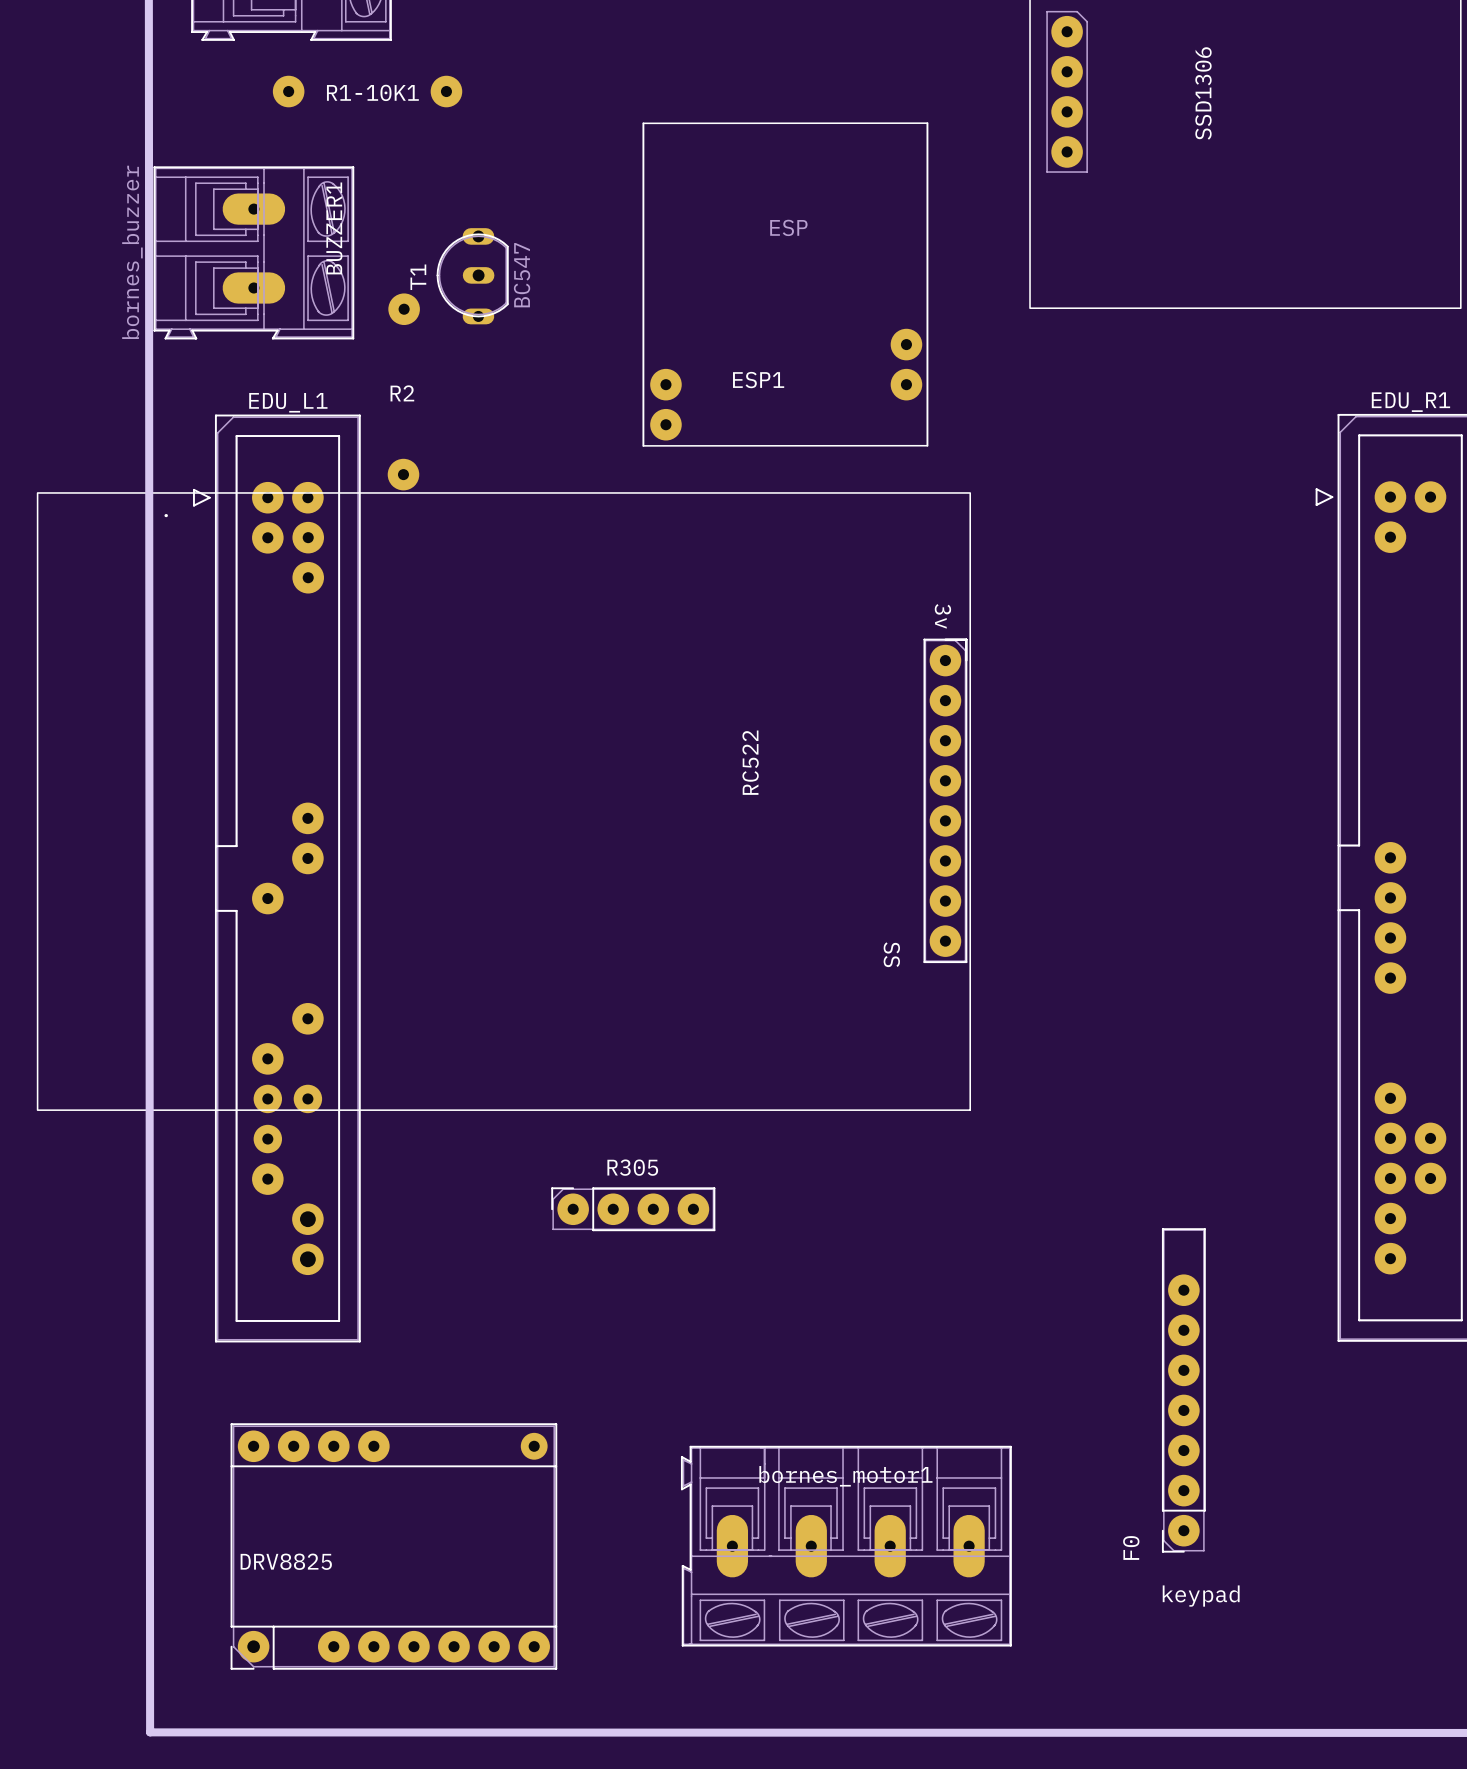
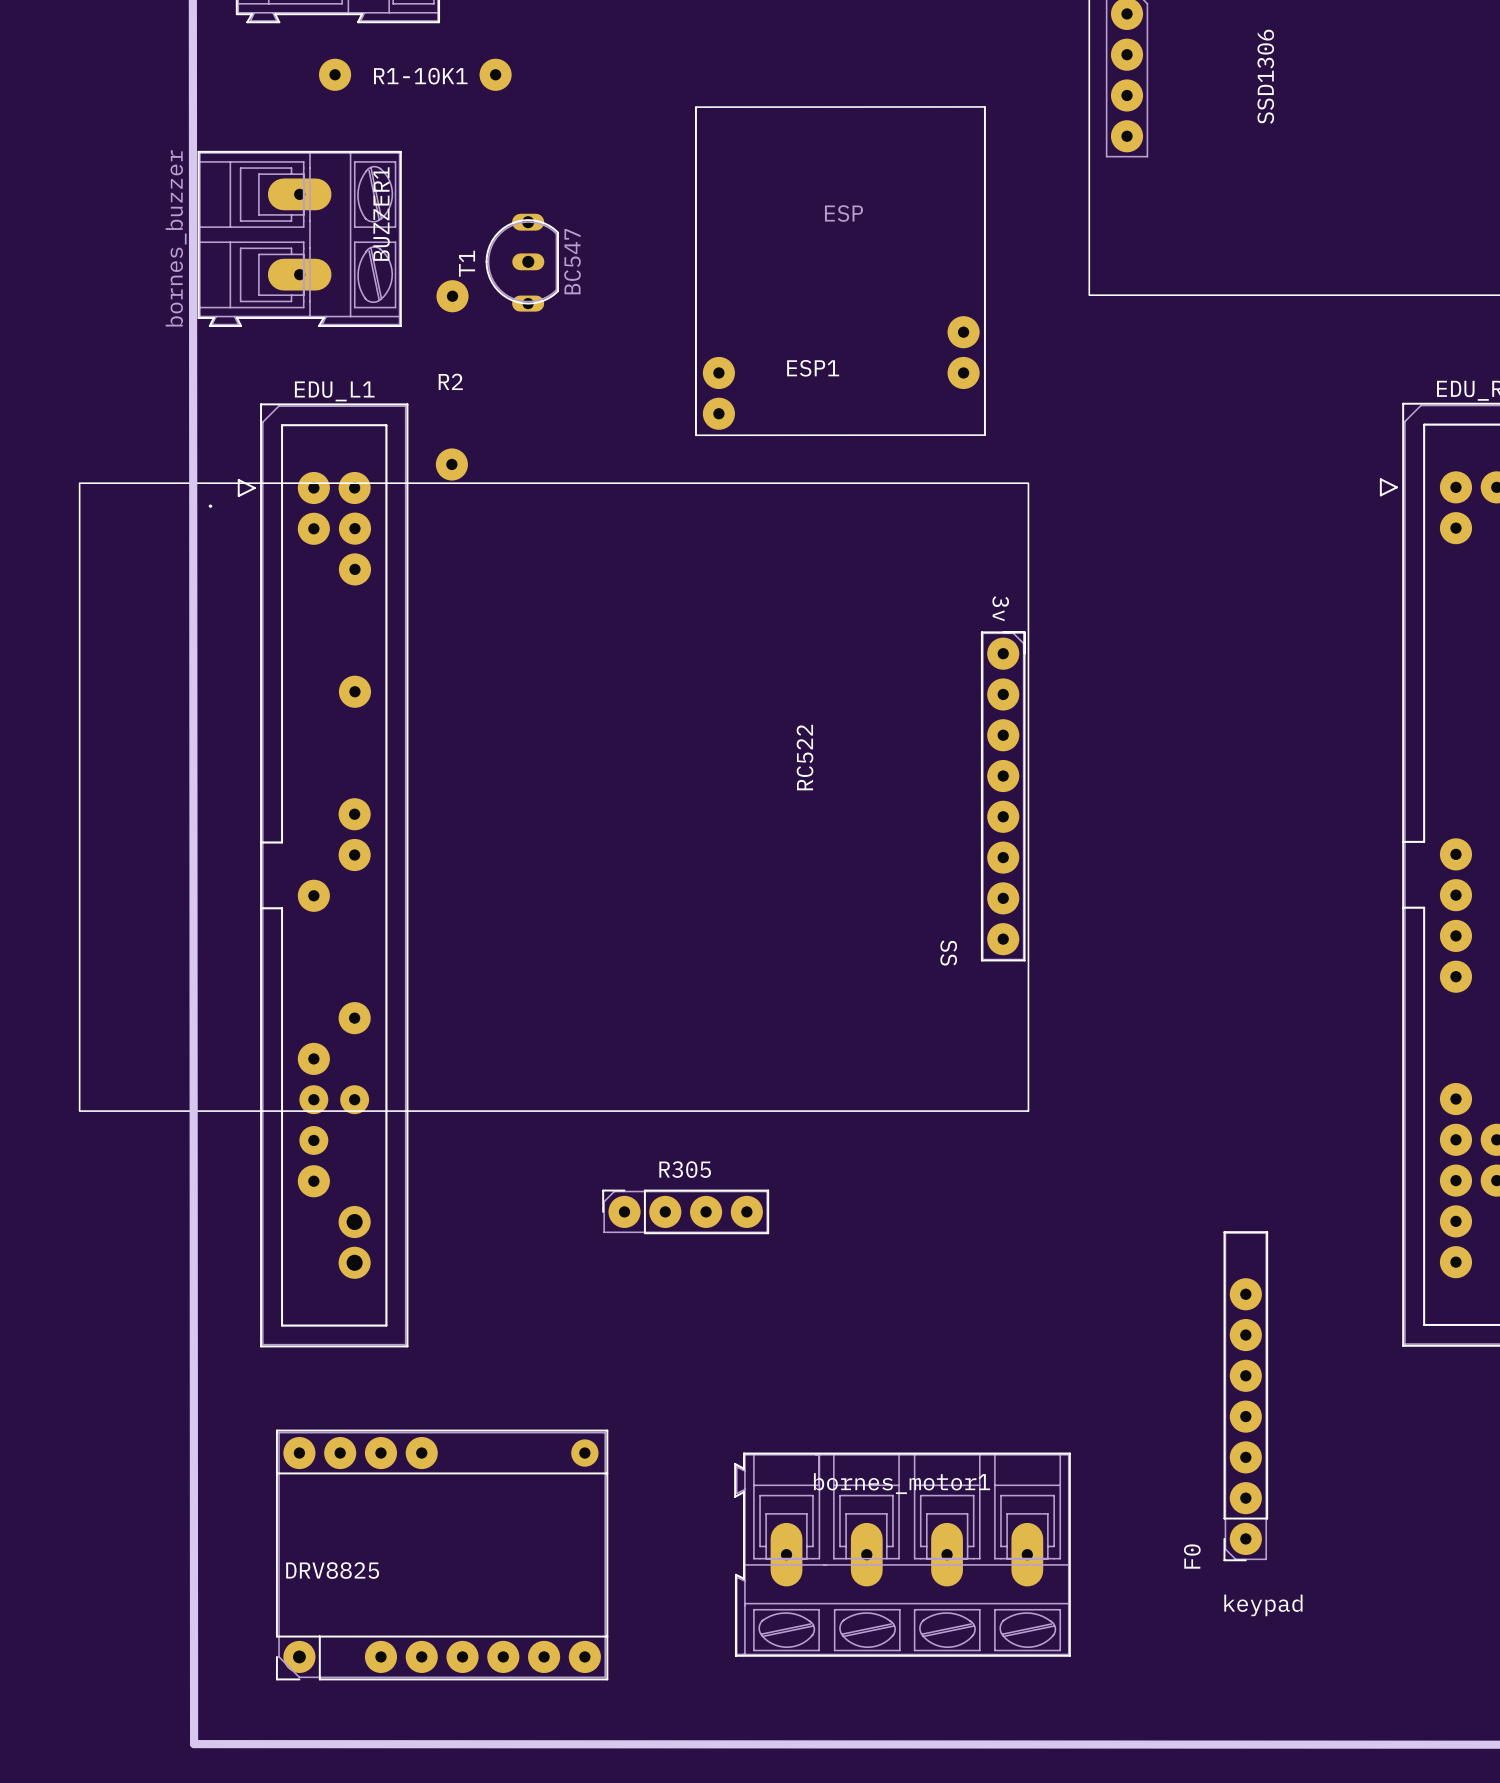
EDU_L1 footprint: [193, 414, 361, 1343] -> [237, 403, 409, 1348]

